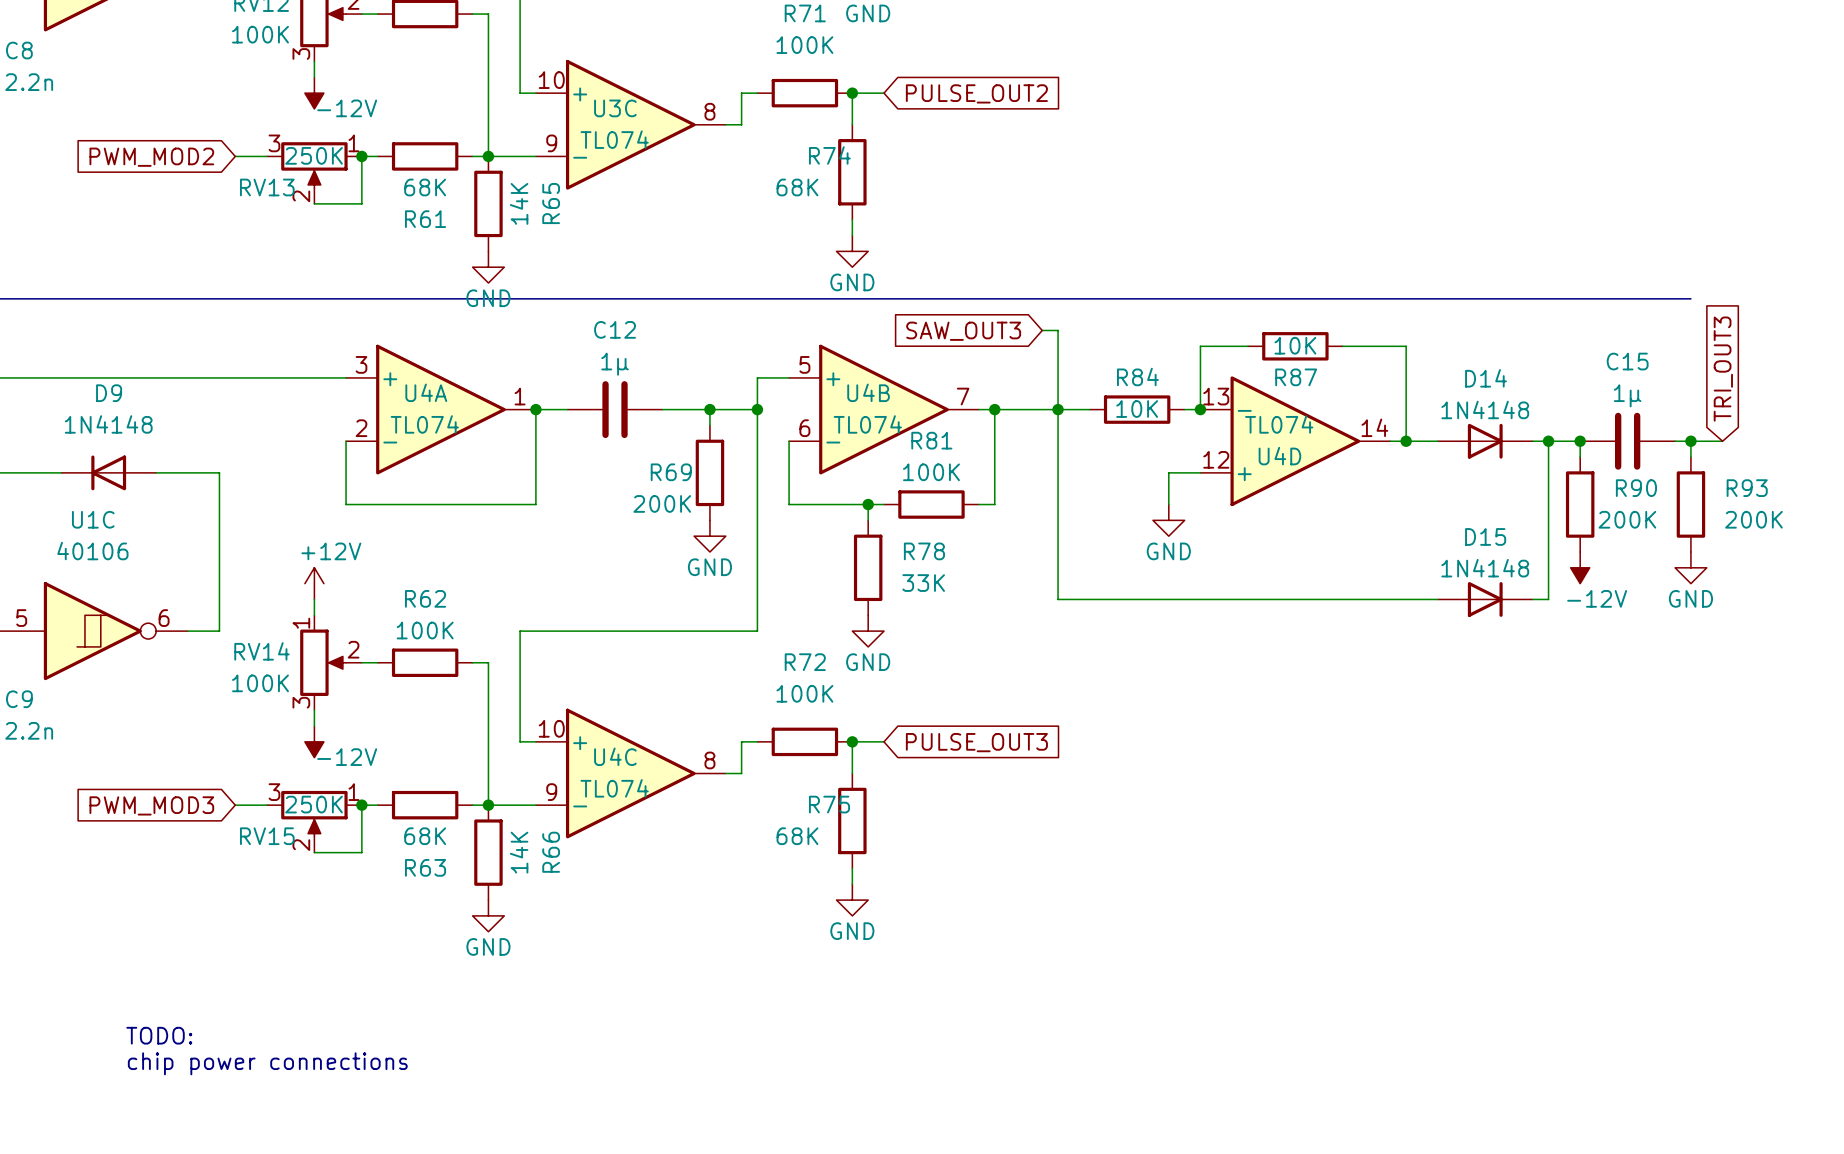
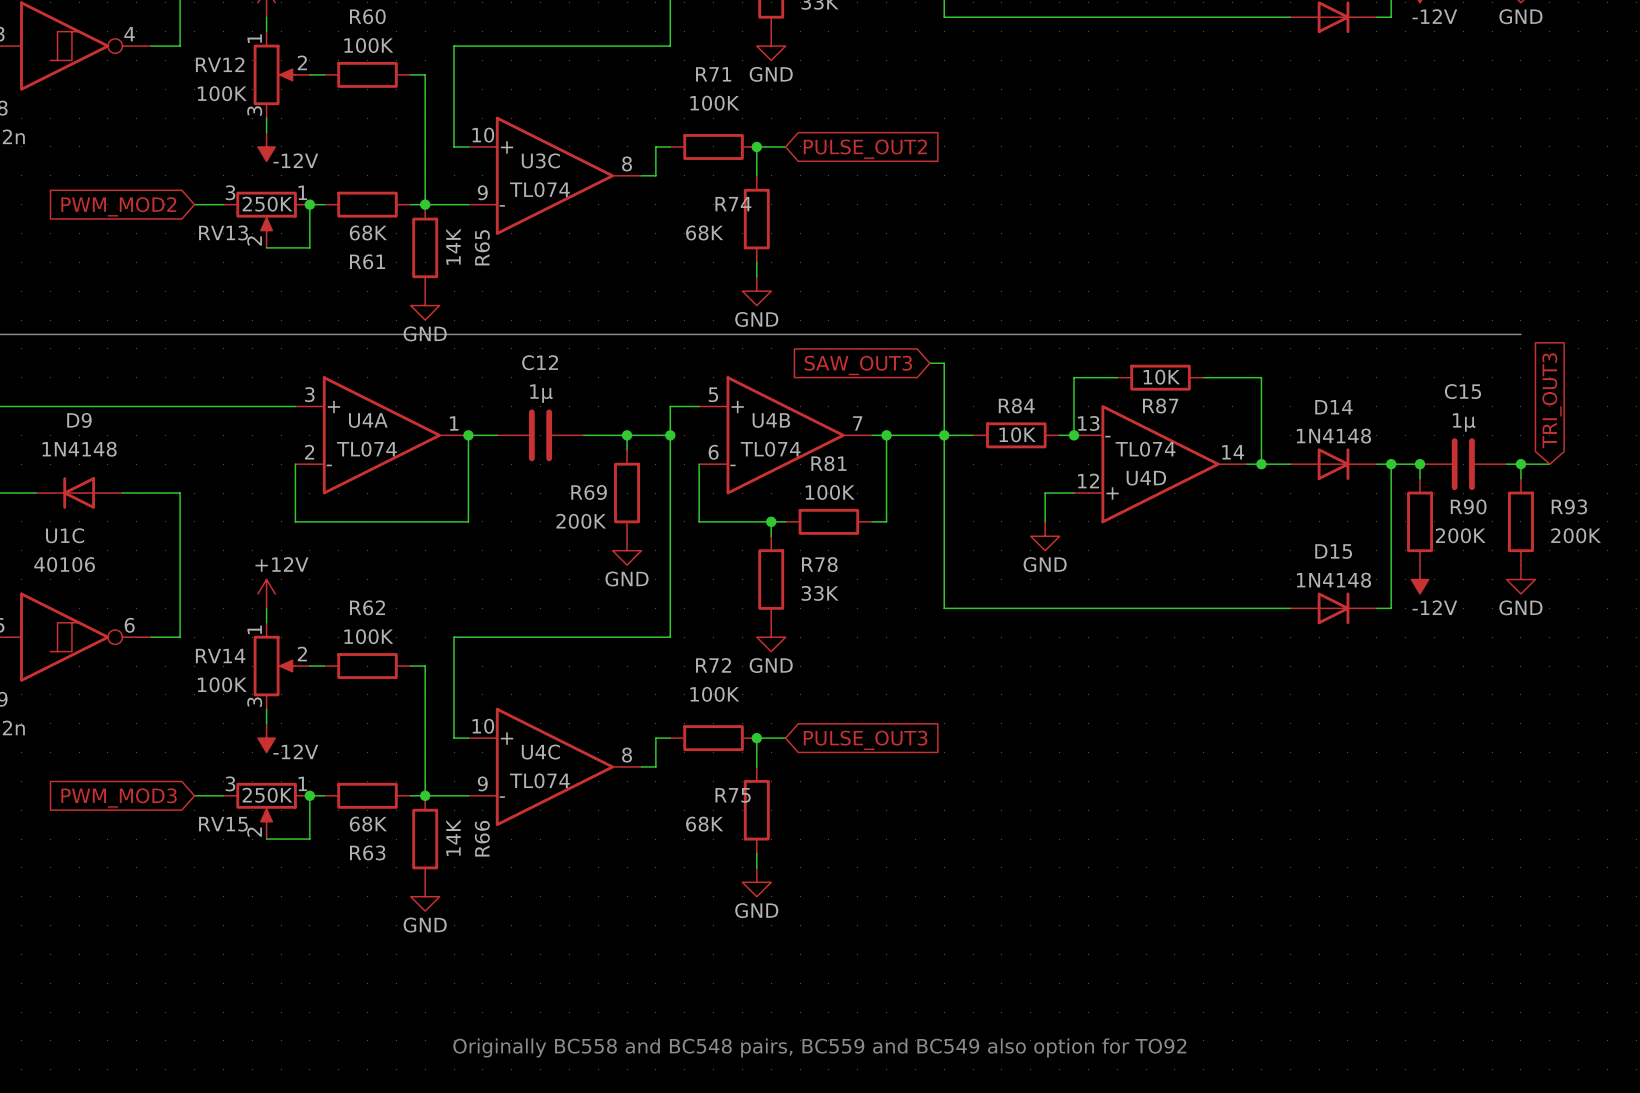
text: TODO: (159, 1035) -> none
text: chip power connections (267, 1063) -> none
text: none -> Originally BC558 and BC548 pairs, BC559 and BC549 also option for TO92 (819, 1047)

